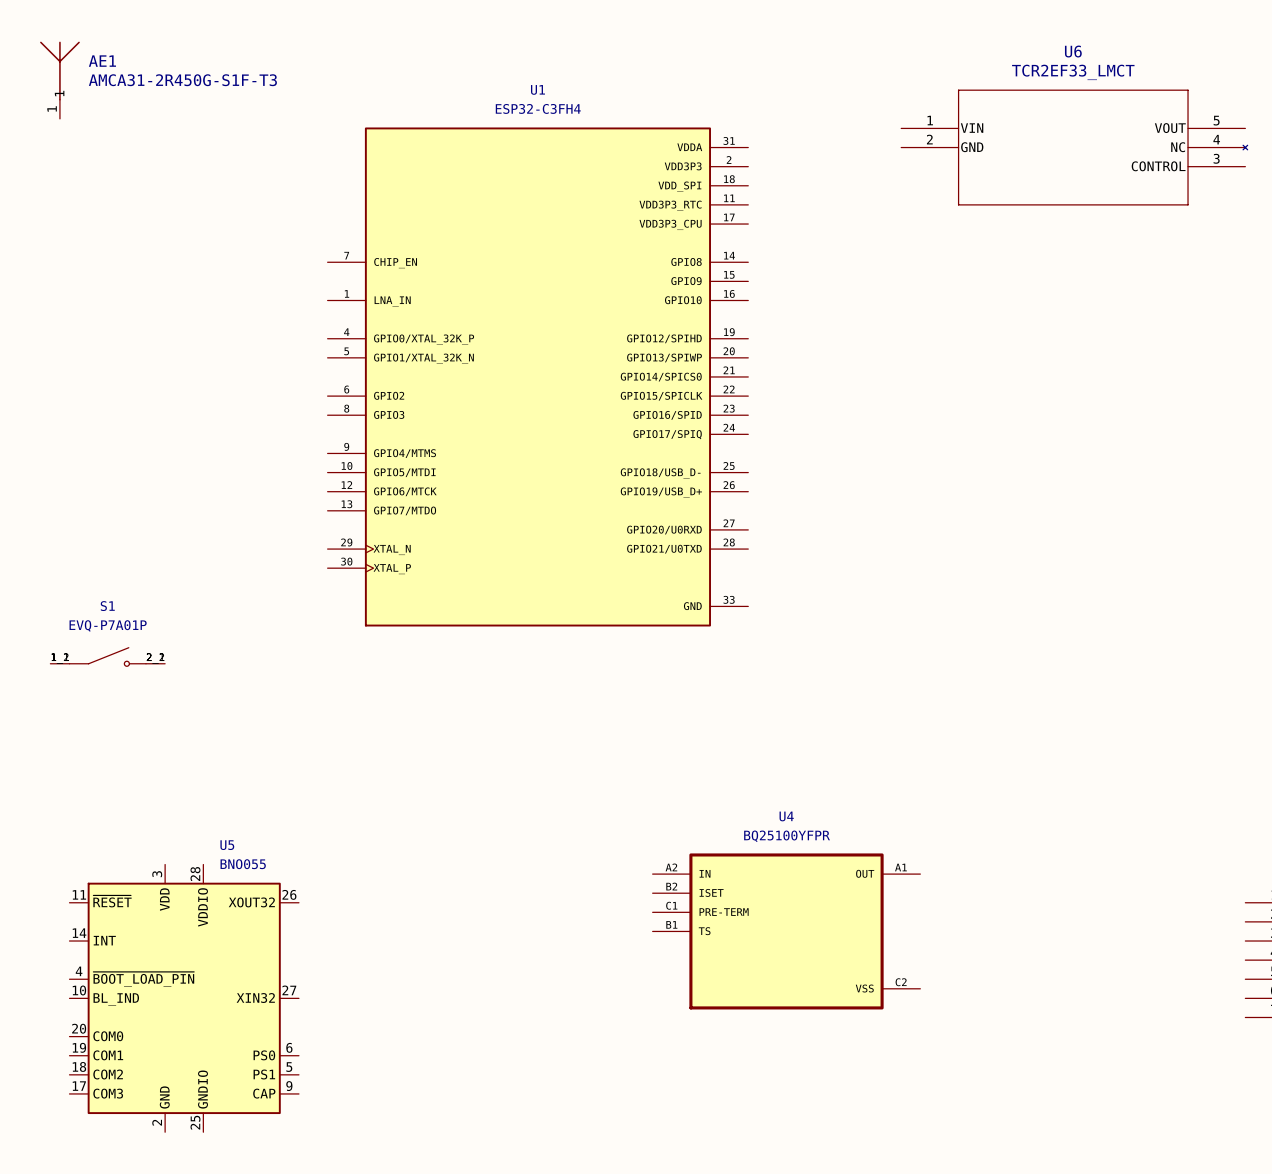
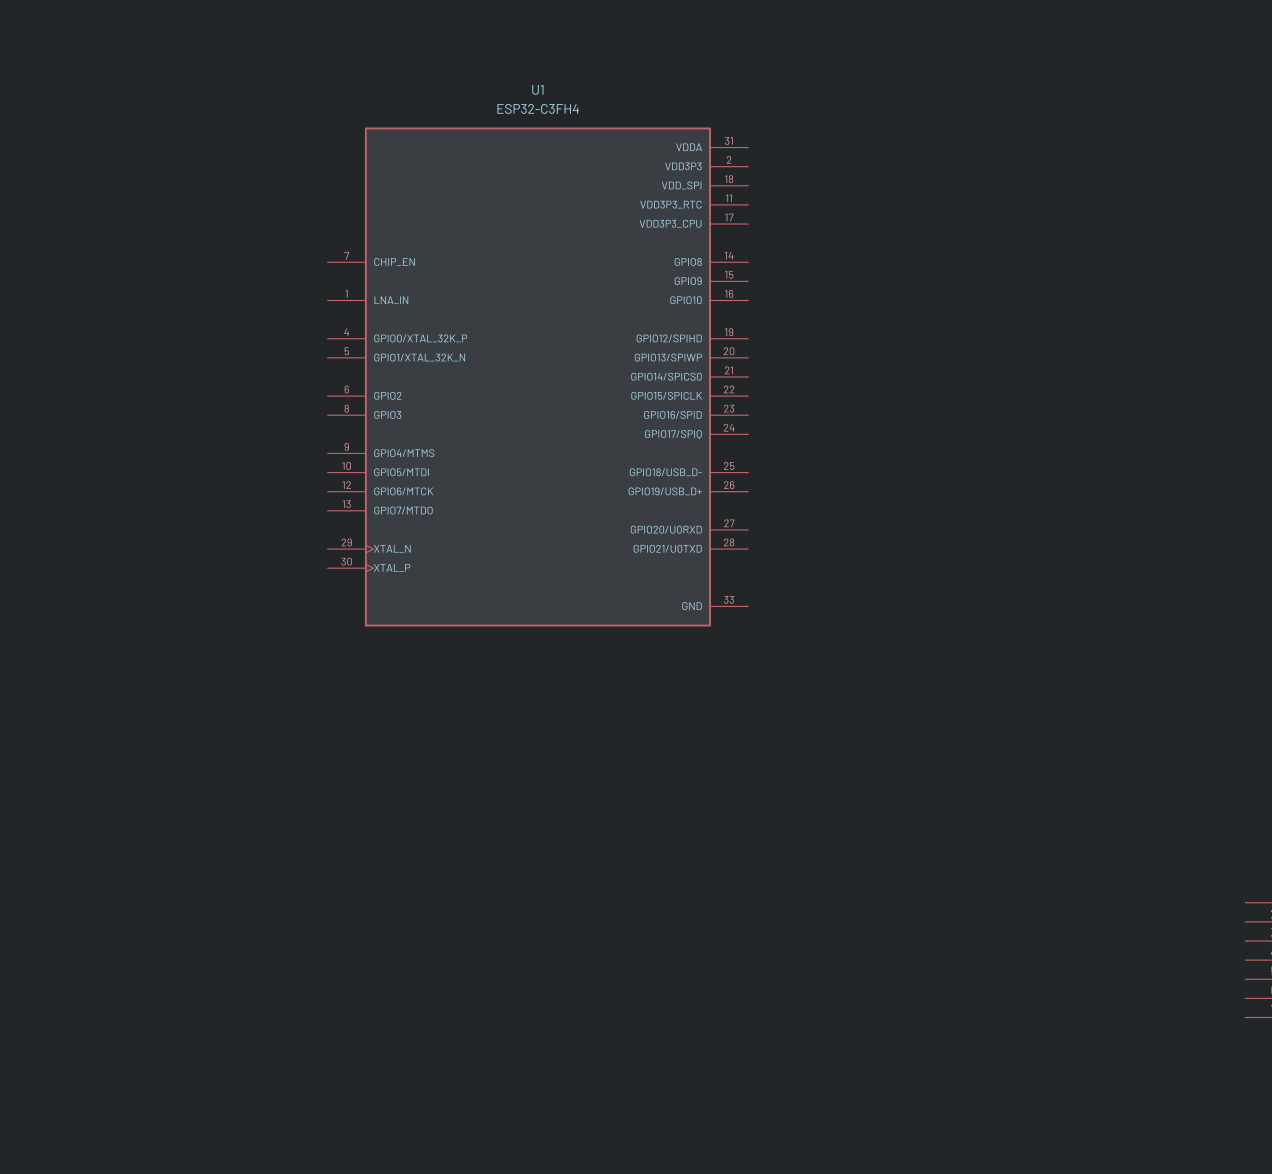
AE1: AMCA31-2R450G-S1F-T3 (59, 80) -> none
U6: TCR2EF33_LMCT (1074, 147) -> none
S1: EVQ-P7A01P (107, 656) -> none
U4: BQ25100YFPR (786, 931) -> none
U5: BNO055 (184, 998) -> none

